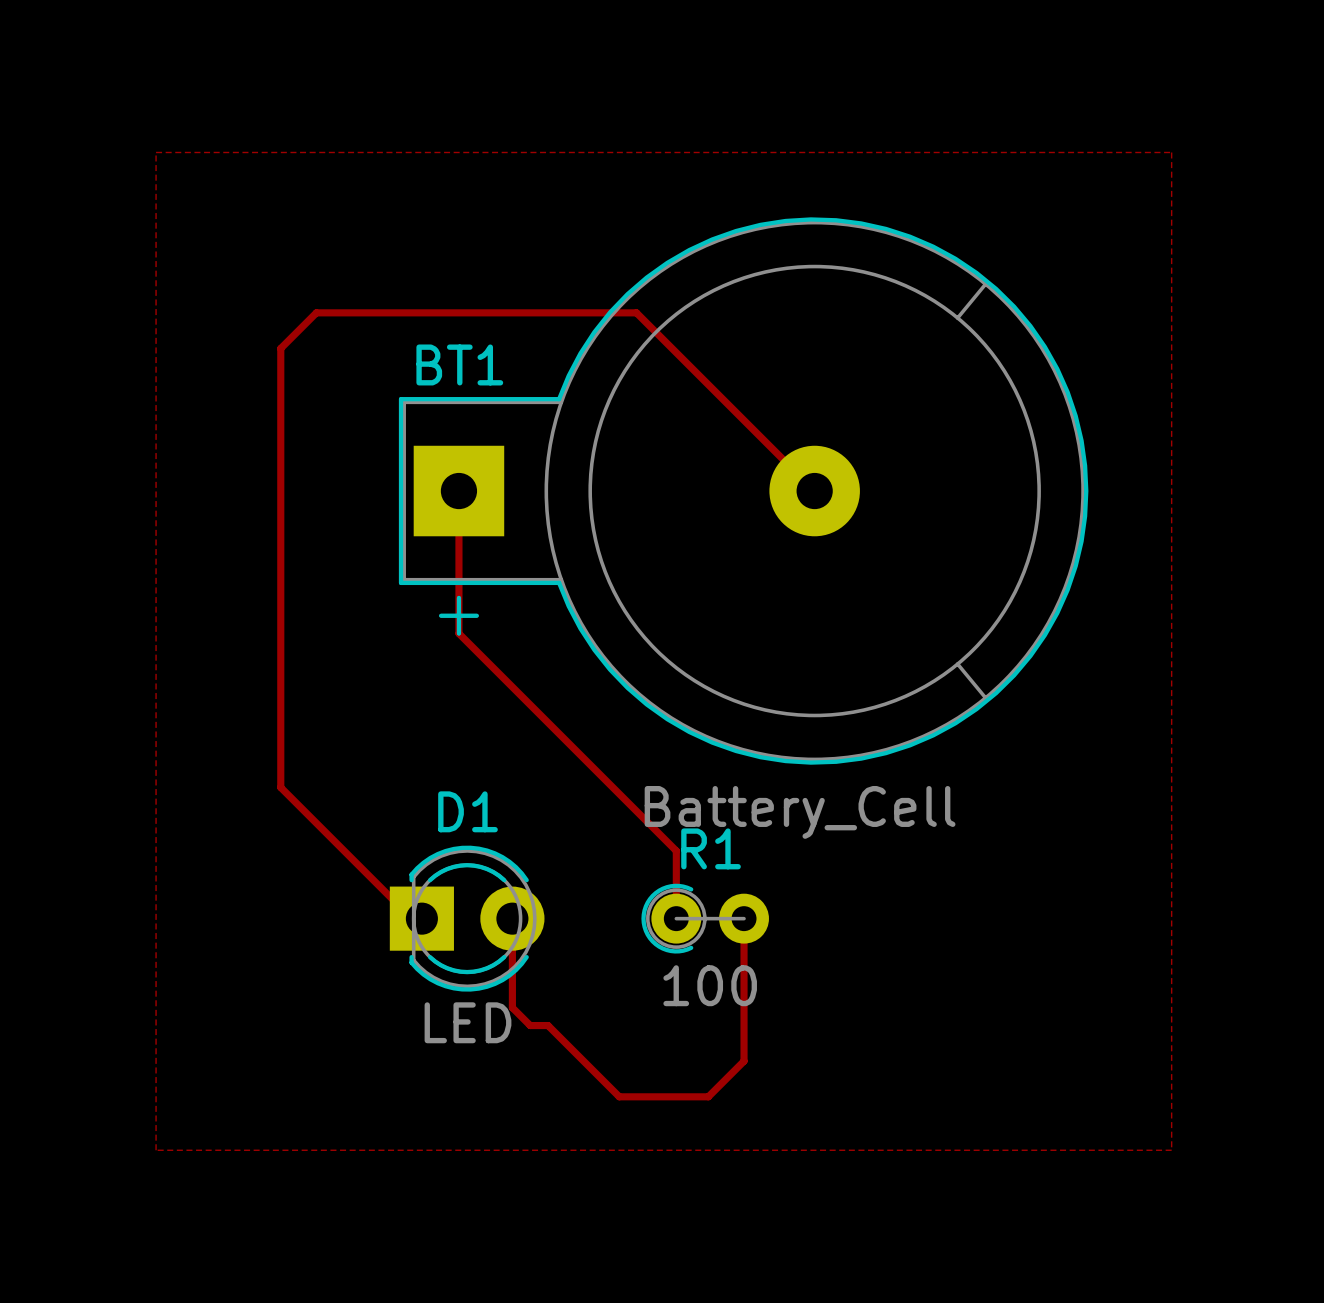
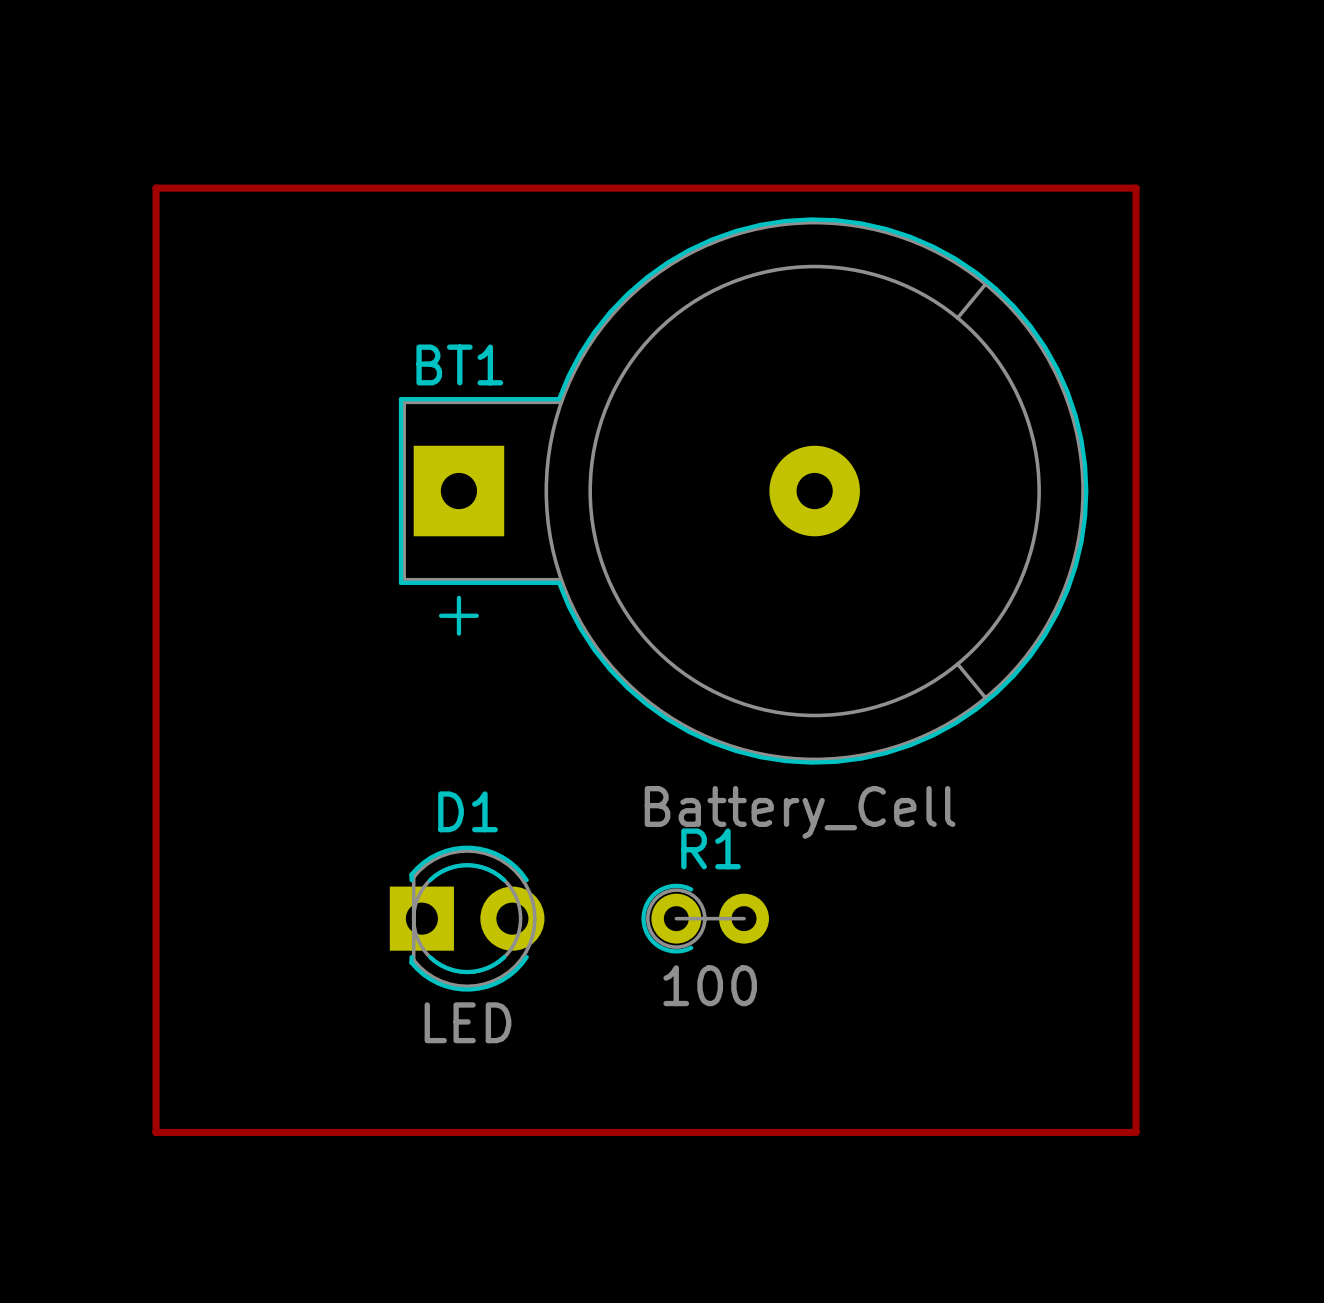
zone outline: (156, 152) (1171, 152) (1171, 1150) (156, 1150) (156, 152) -> none
track: none -> (156, 188) (1136, 188) (1136, 1132) (156, 1132) (156, 188)
track: (458, 491) (458, 633) (676, 850) (676, 918) -> none
track: (814, 491) (636, 312) (316, 312) (280, 348) (280, 787) (394, 900) (405, 900) (398, 906) -> none
track: (512, 918) (512, 1007) (530, 1025) (548, 1025) (619, 1096) (708, 1096) (744, 1061) (744, 918) -> none

